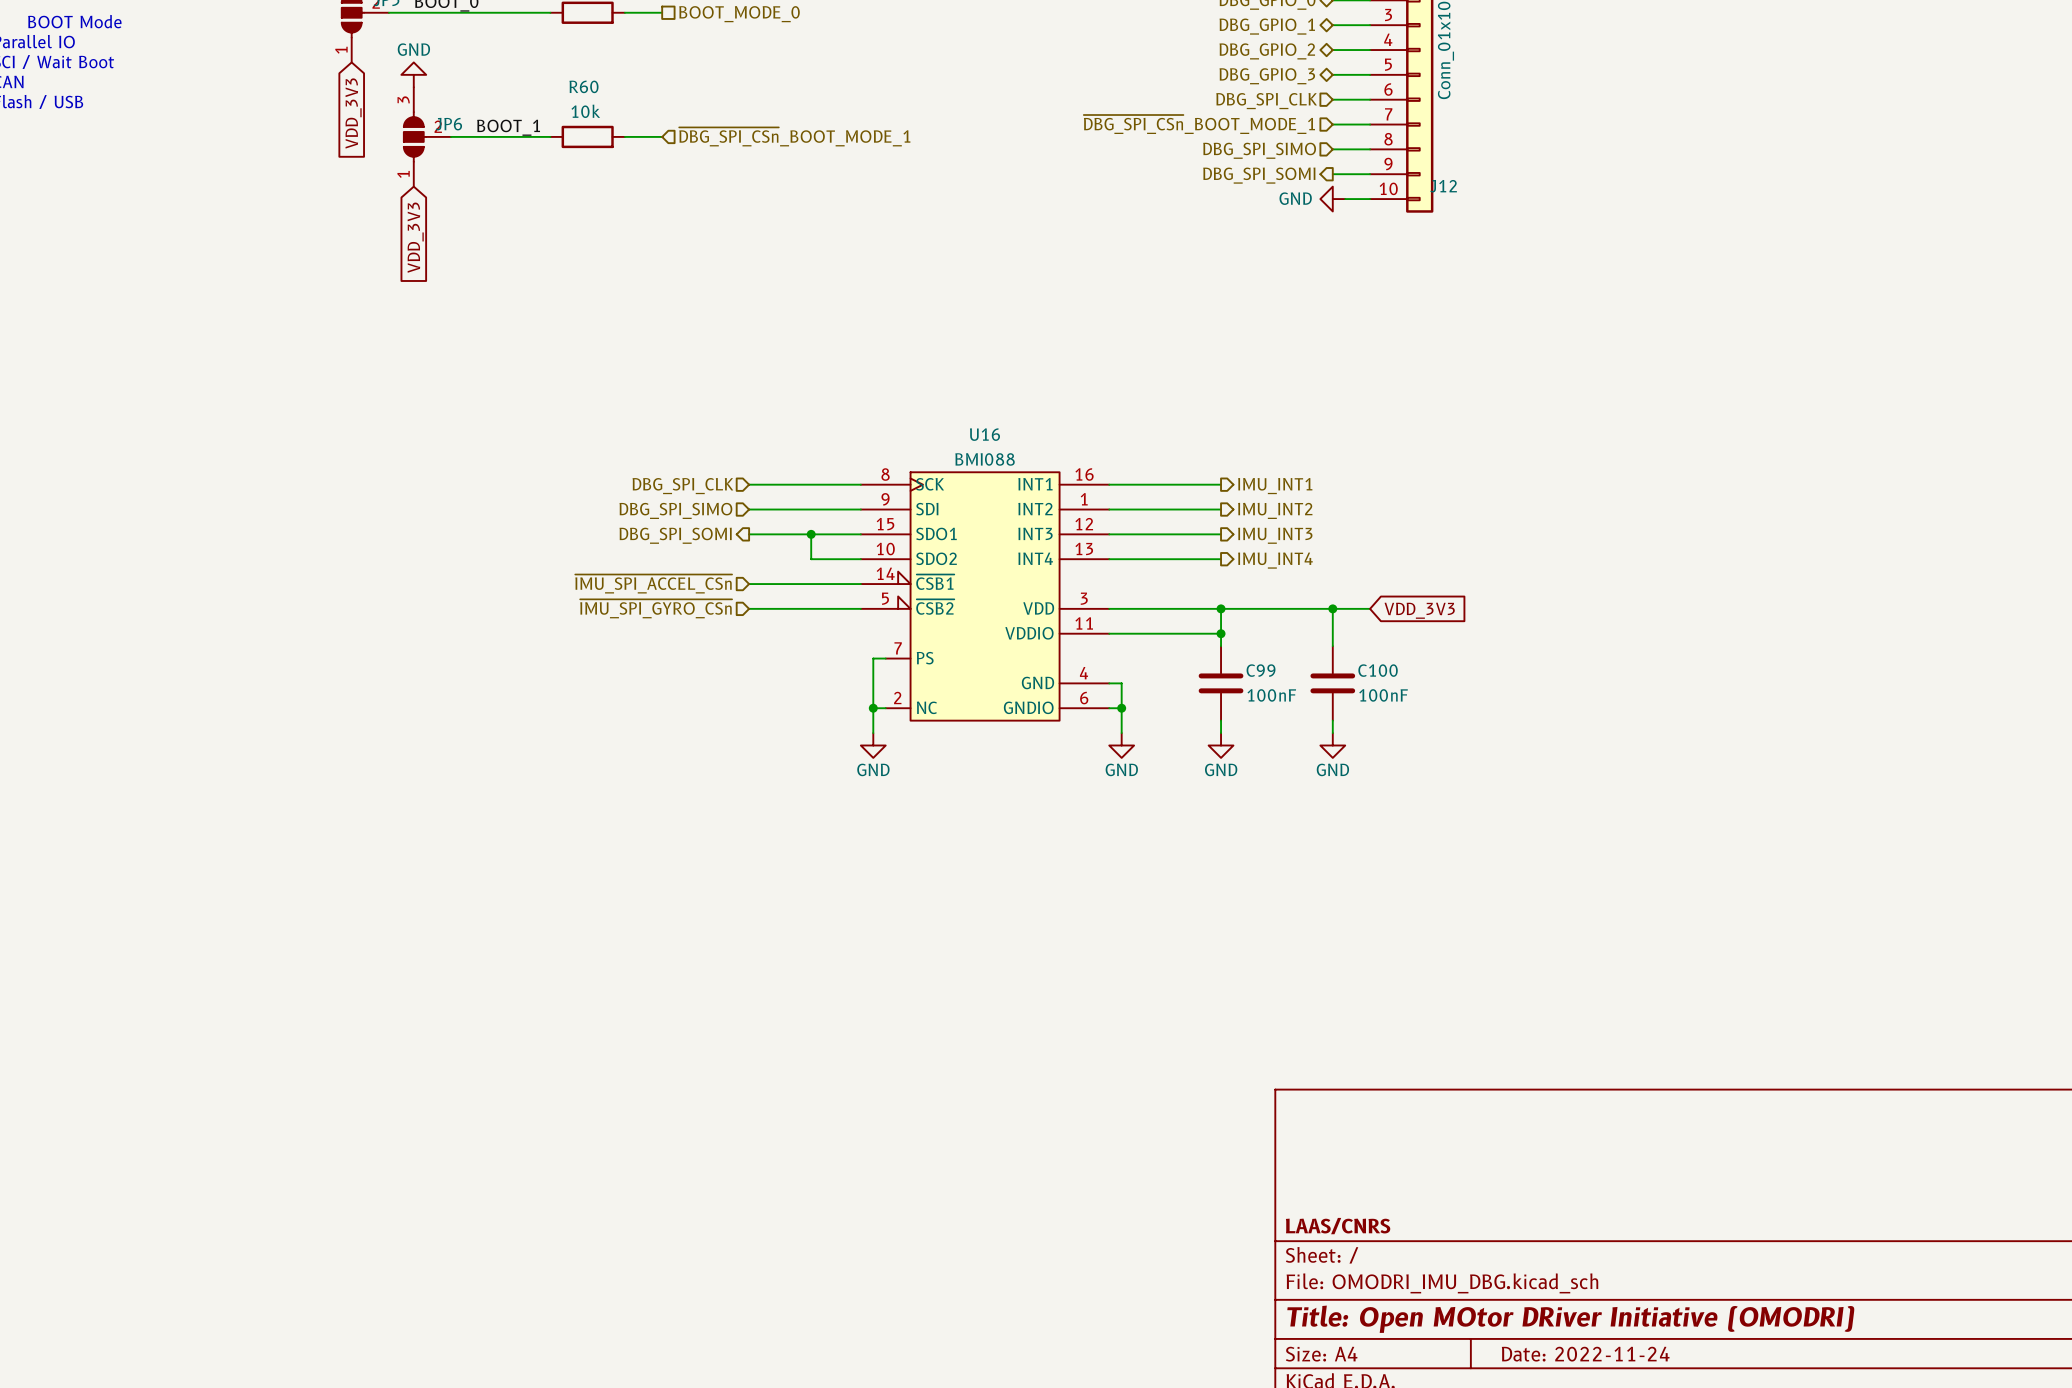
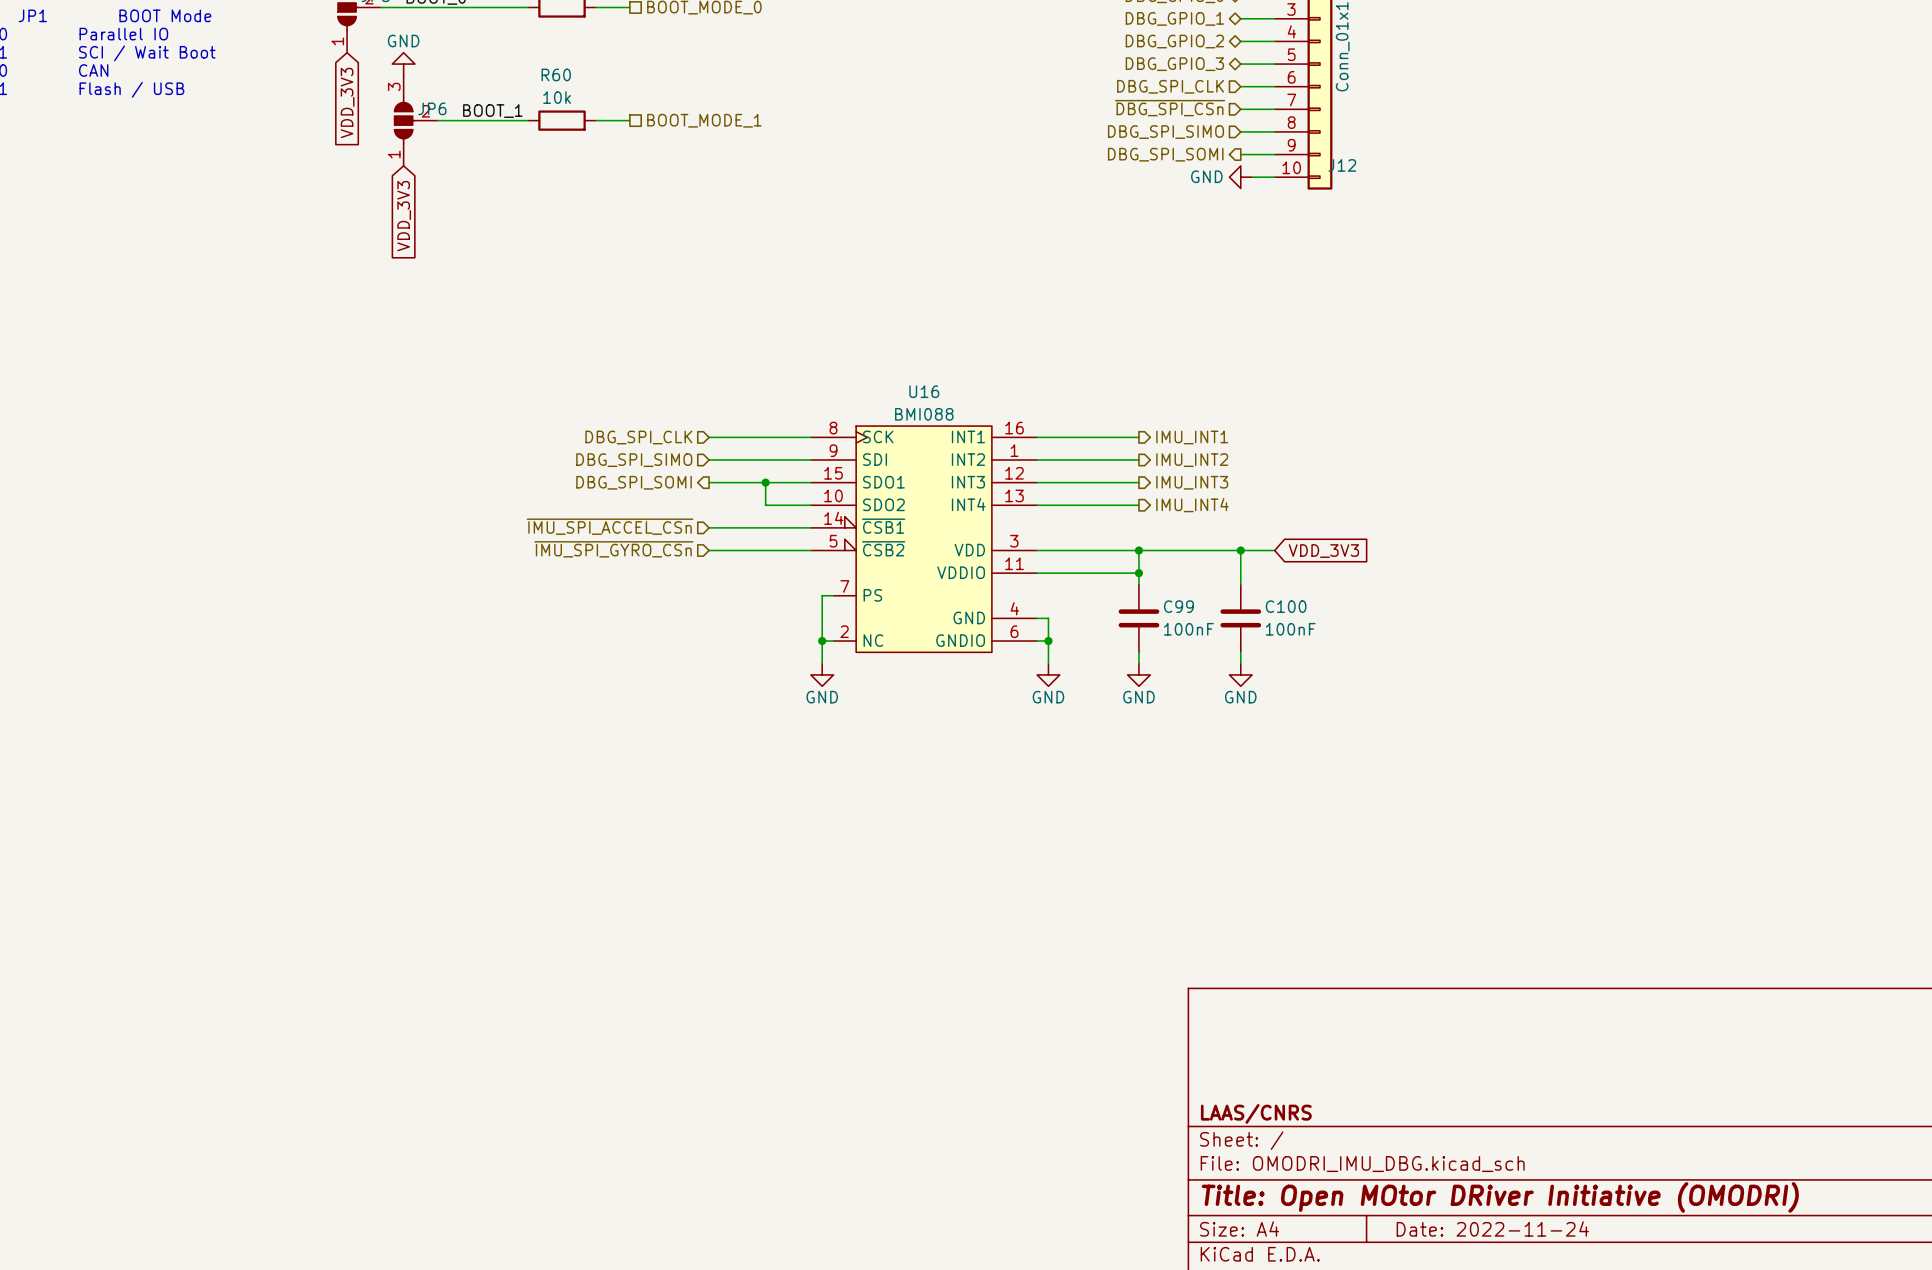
hierarchical label: ~{DBG_SPI_CSn}_BOOT_MODE_1 (1199, 124) -> ~{DBG_SPI_CSn} (1170, 108)
hierarchical label shape: input (794, 136) -> passive (704, 120)
hierarchical label: ~{DBG_SPI_CSn}_BOOT_MODE_1 (794, 136) -> BOOT_MODE_1 (704, 120)

